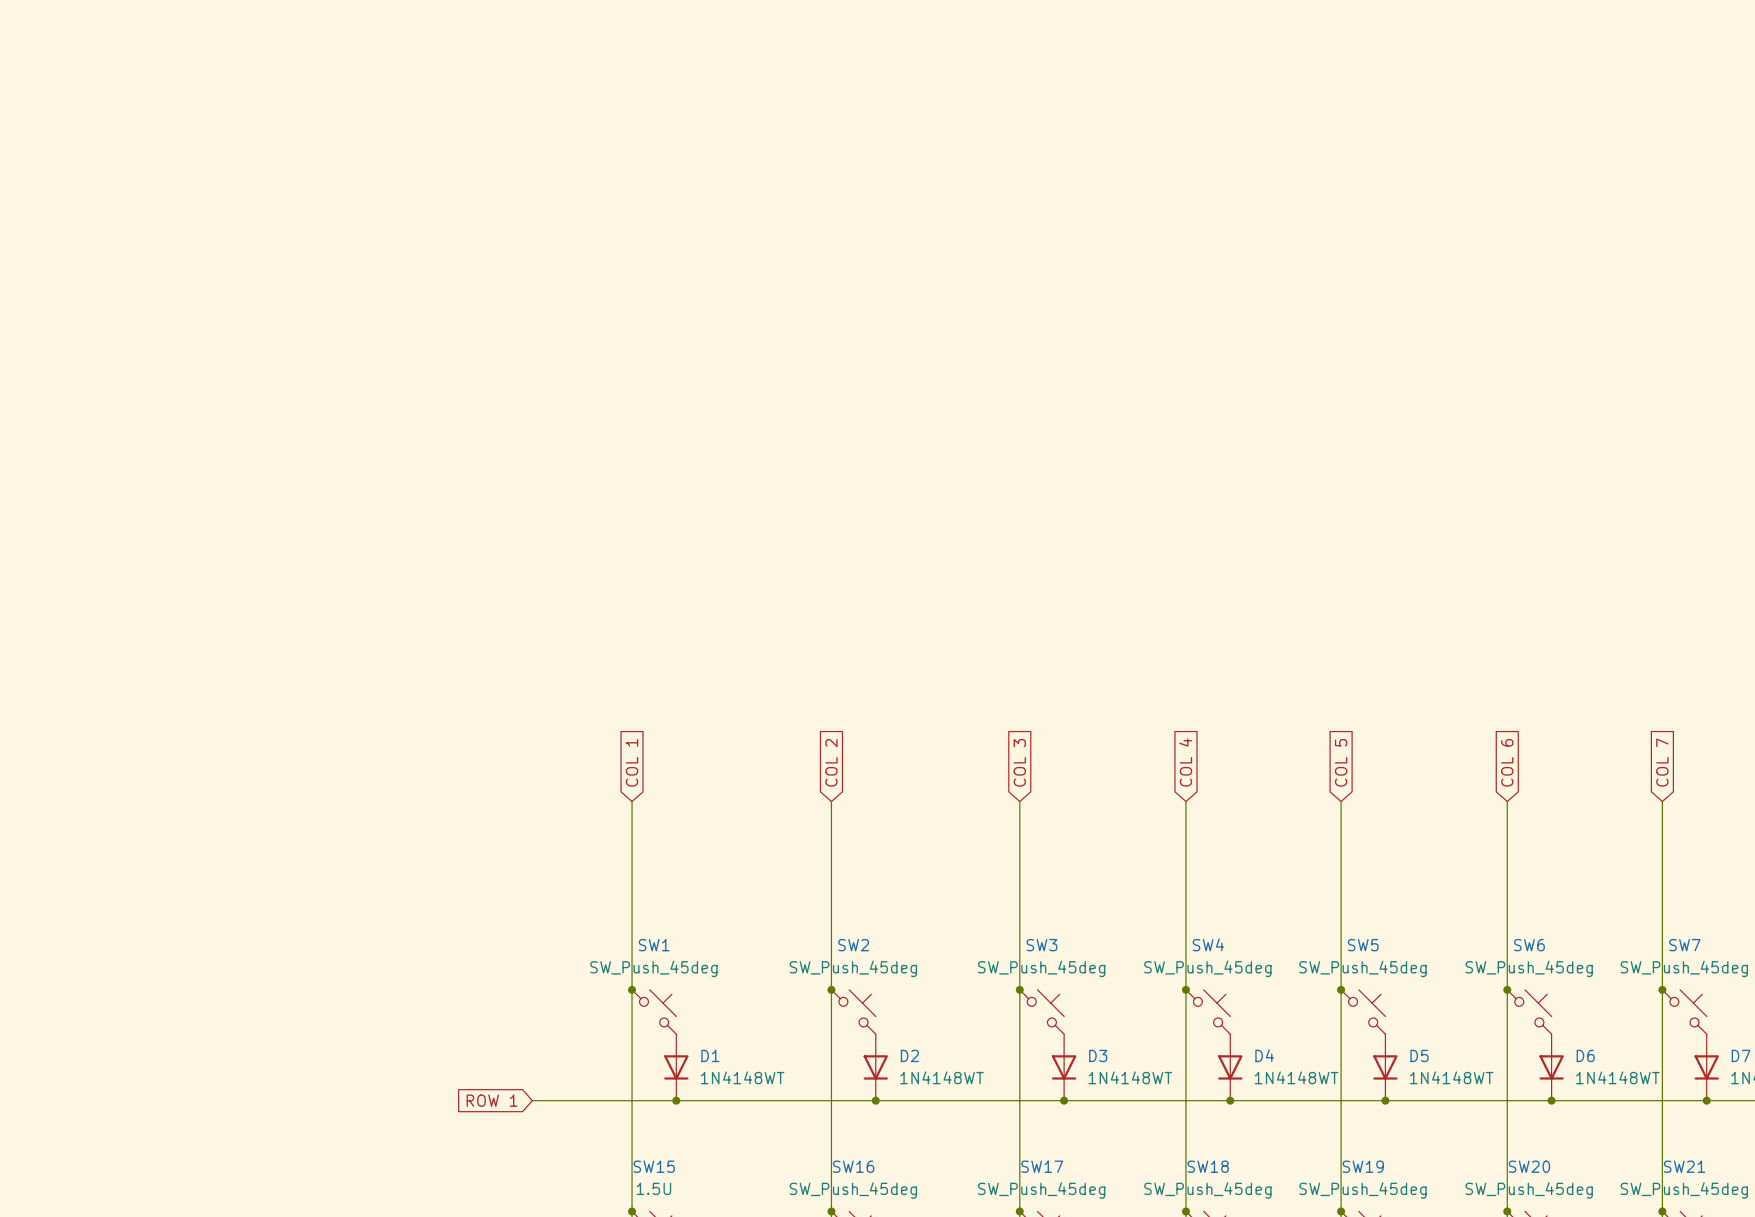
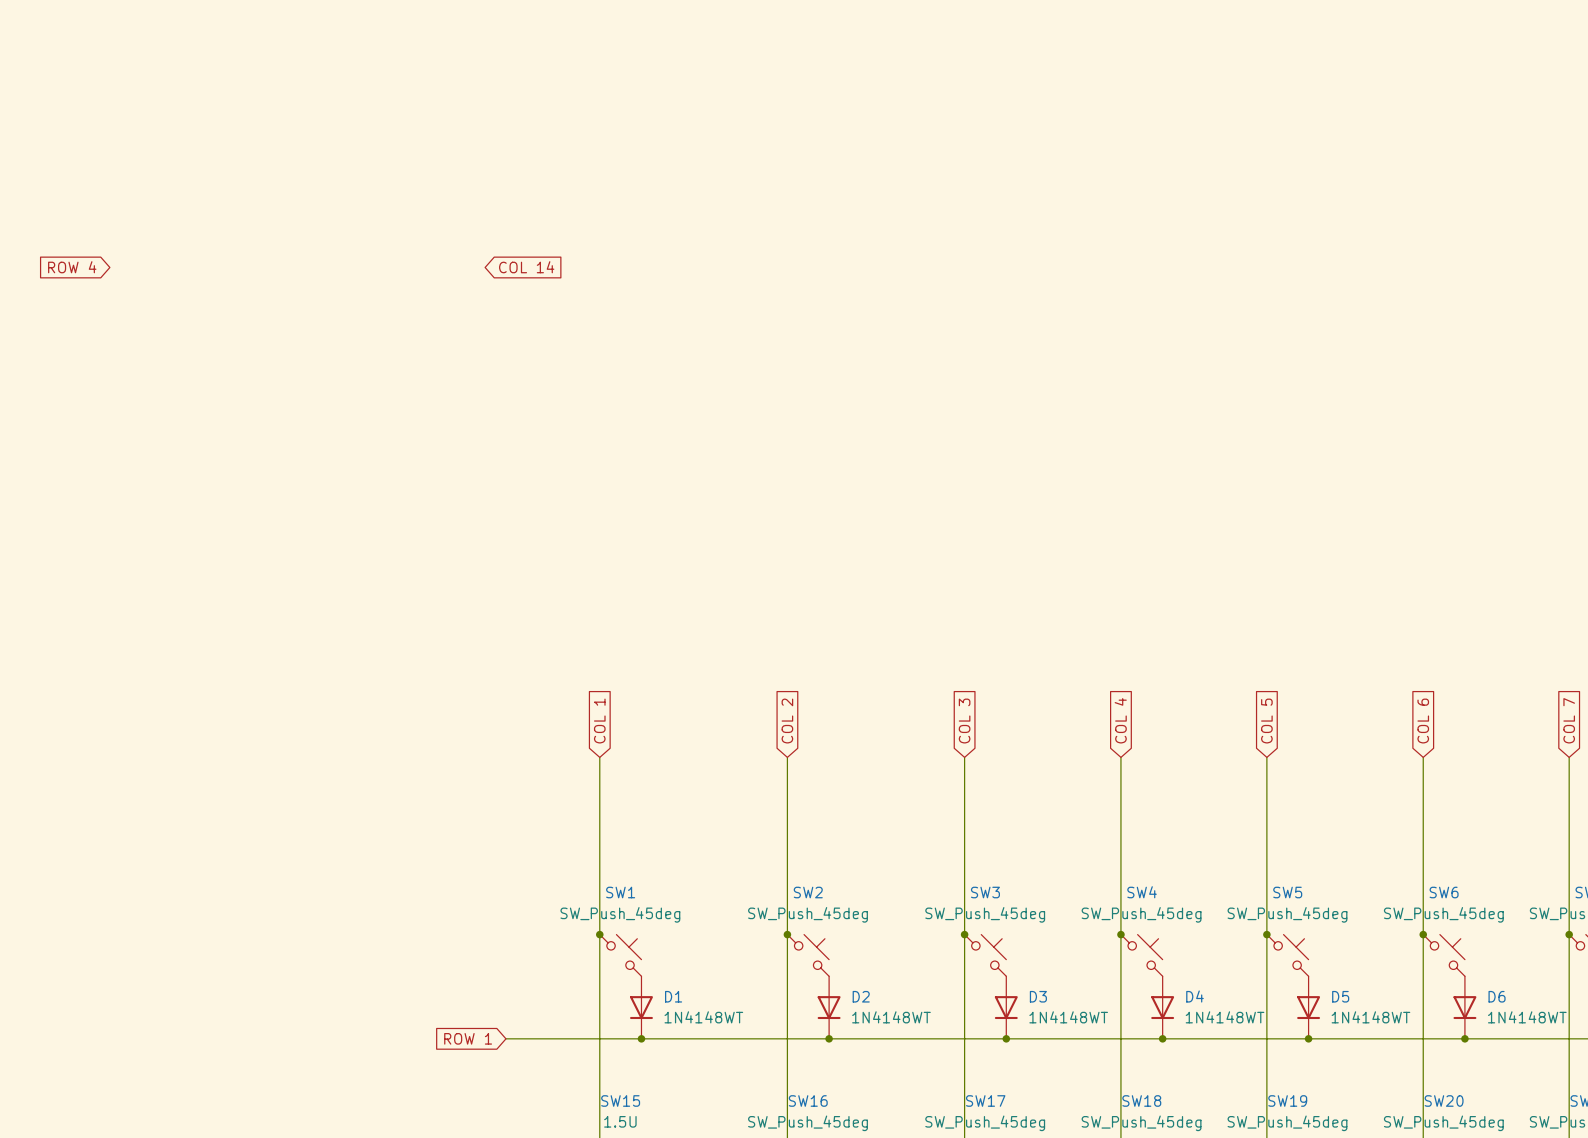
global label: none -> ROW 4 (72, 267)
global label: none -> COL 14 (526, 267)

